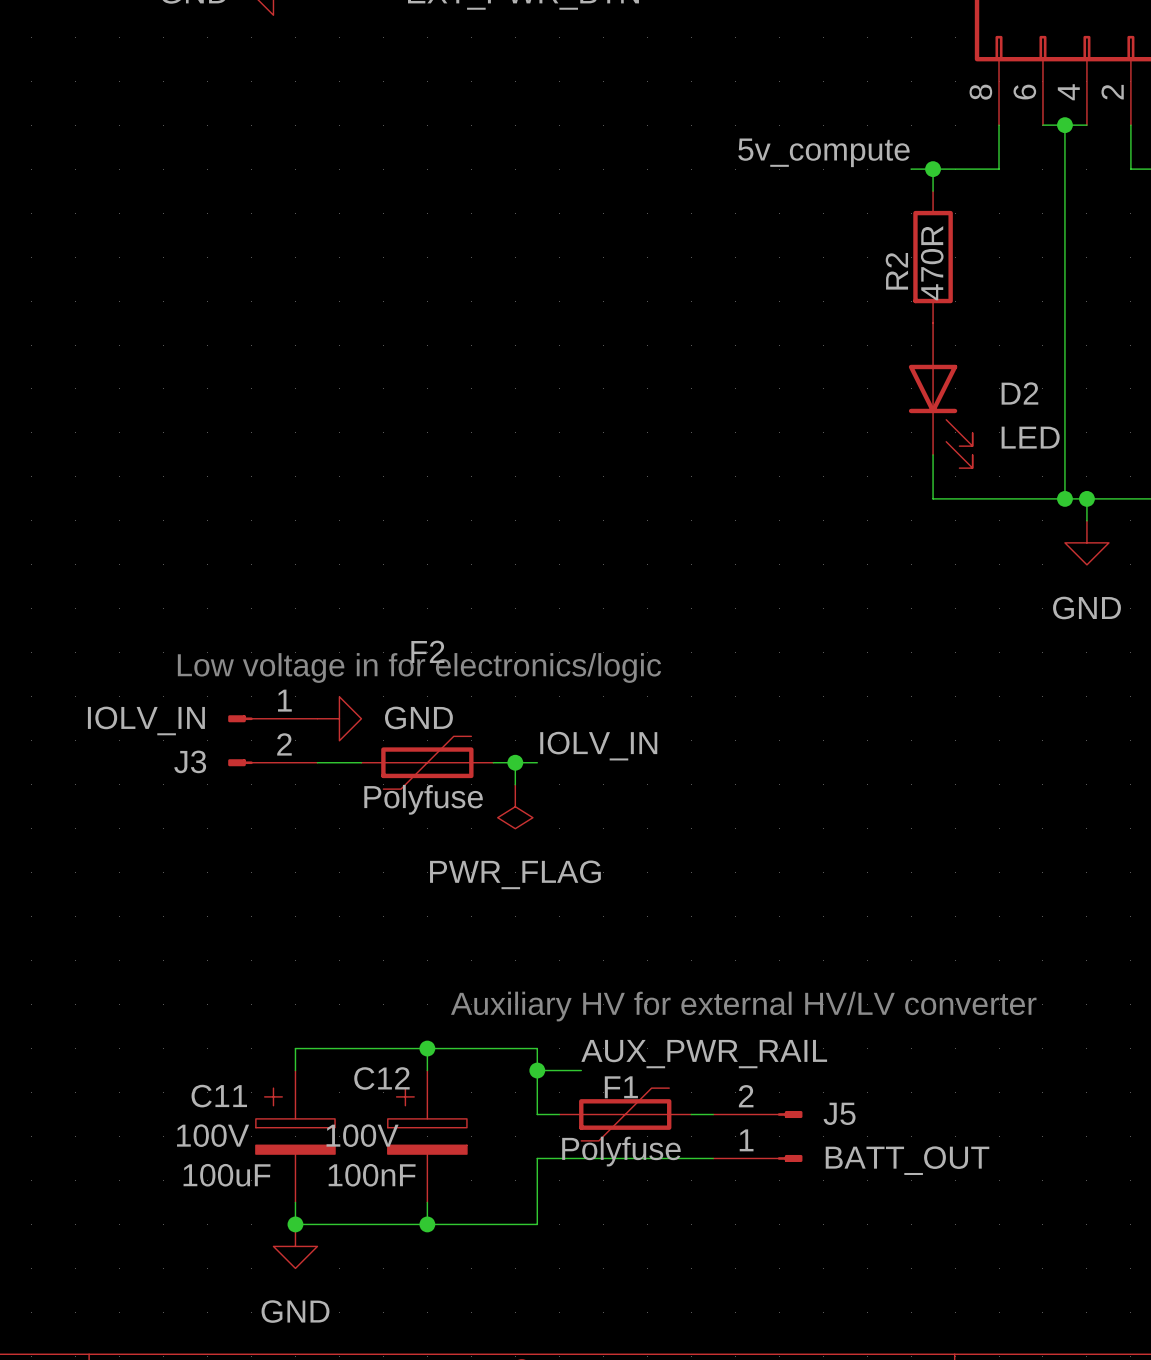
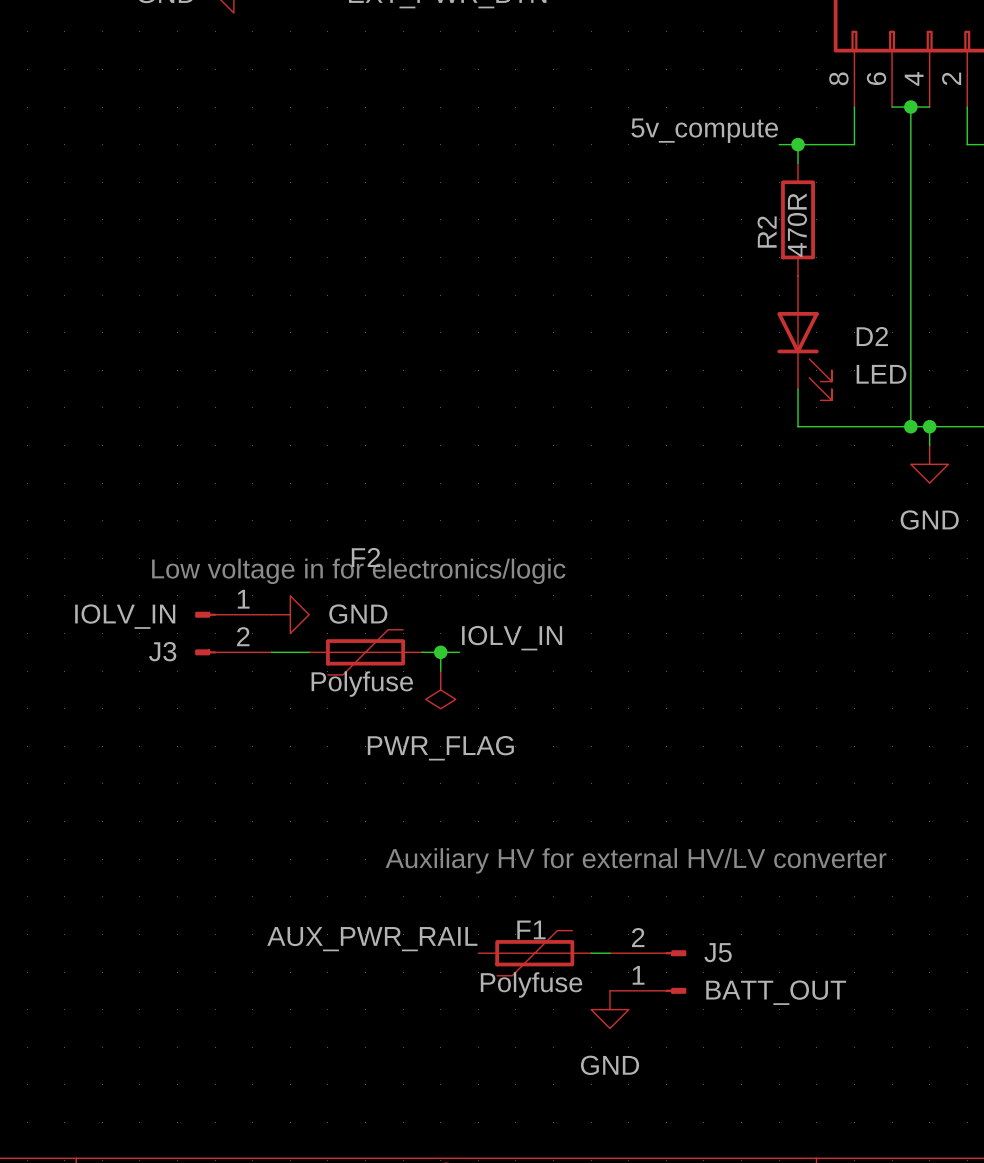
wire: (427, 1048) (427, 1070) -> none
junction: (427, 1048) -> none
label position: AUX_PWR_RAIL (704, 1054) -> AUX_PWR_RAIL (372, 939)
wire: (295, 1070) (295, 1048) (537, 1048) (537, 1114) (559, 1114) -> none
wire: (537, 1070) (581, 1070) -> none
junction: (537, 1070) -> none
C11: 100uF (295, 1136) -> none
C12: 100nF (427, 1136) -> none
wire: (713, 1158) (537, 1158) (537, 1224) (295, 1224) (295, 1202) -> none
wire: (427, 1202) (427, 1224) -> none
junction: (295, 1224) -> none
junction: (427, 1224) -> none
power symbol position: GND (295, 1246) -> GND (609, 1009)

